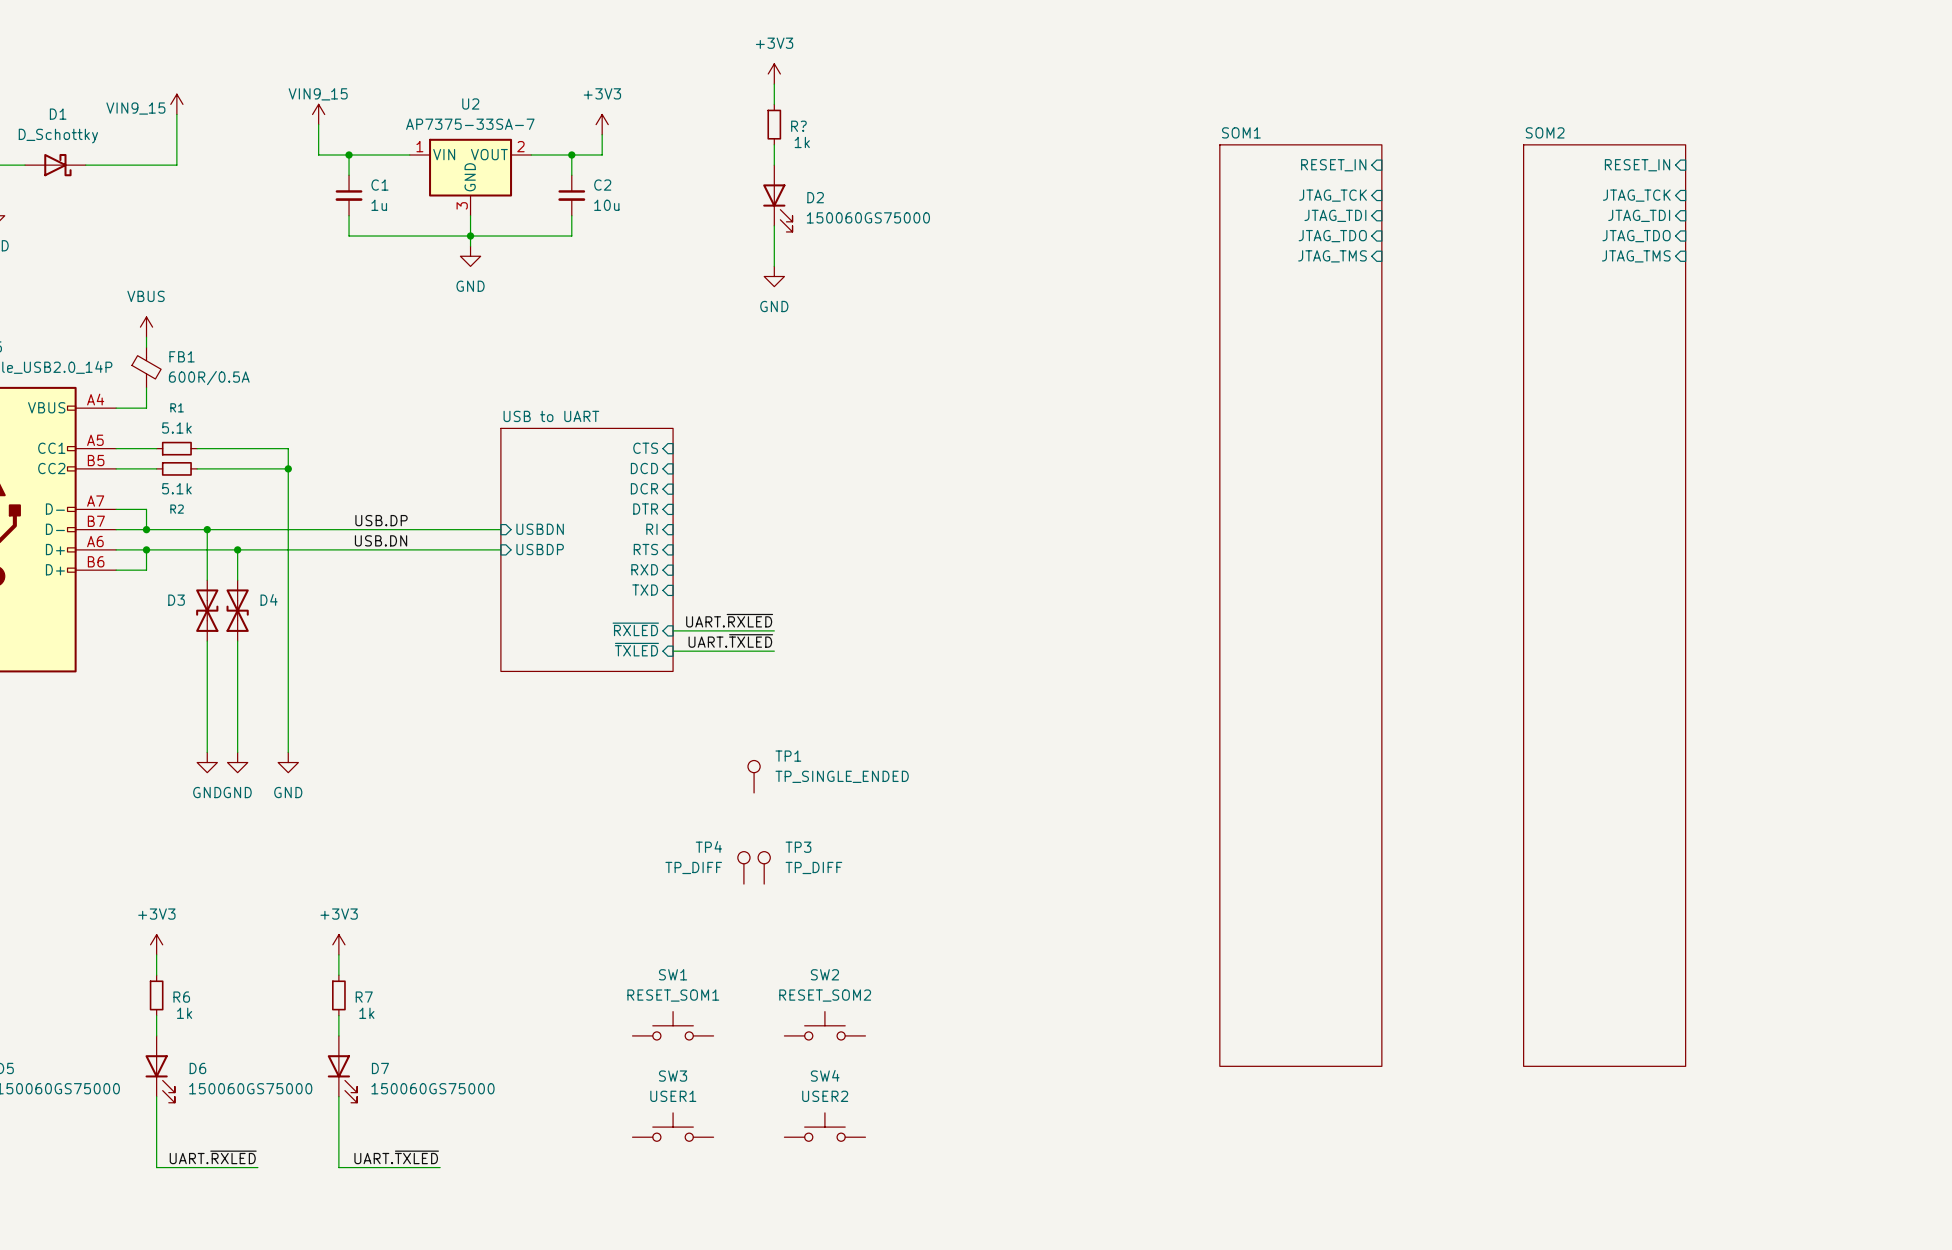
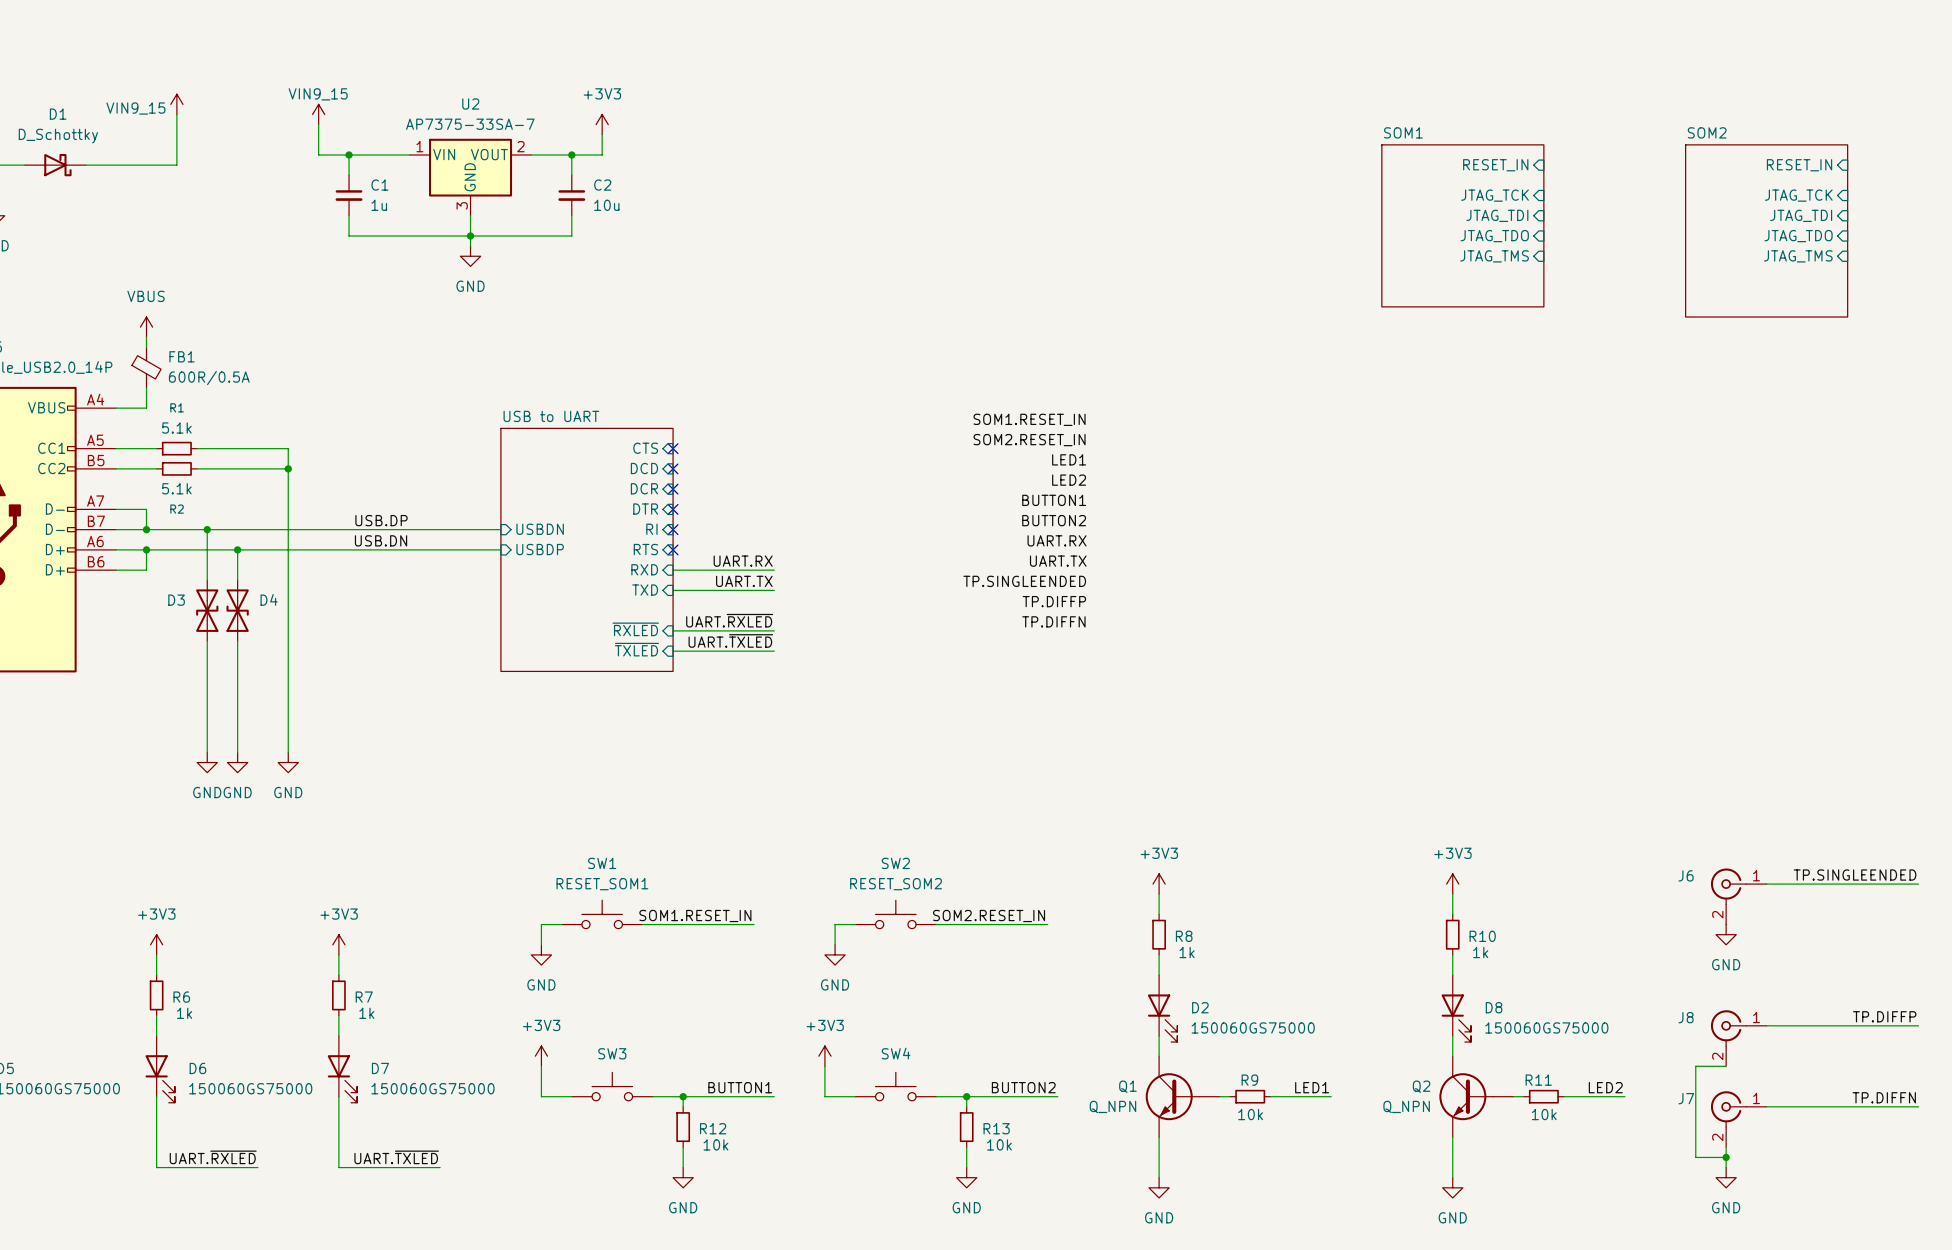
power symbol: +3V3 (774, 73) -> none
wire: (774, 84) (774, 104) -> none
R?: 1k (774, 124) -> none
sheet SOM1 name position: SOM1 (1241, 132) -> SOM1 (1403, 132)
sheet SOM2 name position: SOM2 (1545, 132) -> SOM2 (1707, 132)
wire: (774, 144) (774, 165) -> none
sheet SOM1 shape: [1219, 144, 1383, 1067] -> [1381, 144, 1545, 308]
sheet SOM2 shape: [1523, 144, 1687, 1067] -> [1685, 144, 1849, 318]
sheet pin: RESET_IN (1333, 165) -> none
sheet pin: none -> RESET_IN (1495, 165)
sheet pin: RESET_IN (1637, 165) -> none
sheet pin: none -> RESET_IN (1799, 165)
sheet pin: JTAG_TCK (1333, 195) -> none
sheet pin: none -> JTAG_TCK (1495, 195)
sheet pin: JTAG_TCK (1636, 195) -> none
sheet pin: none -> JTAG_TCK (1798, 195)
D2 position: (777, 198) -> (1162, 1008)
sheet pin: JTAG_TDI (1335, 215) -> none
sheet pin: none -> JTAG_TDI (1497, 215)
sheet pin: JTAG_TDI (1639, 215) -> none
sheet pin: none -> JTAG_TDI (1801, 215)
wire: (774, 225) (774, 266) -> none
sheet pin: JTAG_TDO (1332, 236) -> none
sheet pin: none -> JTAG_TDO (1494, 236)
sheet pin: JTAG_TDO (1636, 236) -> none
sheet pin: none -> JTAG_TDO (1798, 236)
sheet pin: JTAG_TMS (1332, 256) -> none
sheet pin: none -> JTAG_TMS (1494, 256)
sheet pin: JTAG_TMS (1636, 256) -> none
sheet pin: none -> JTAG_TMS (1798, 256)
power symbol: GND (774, 276) -> none
label: none -> SOM1.RESET_IN (1029, 419)
label: none -> SOM2.RESET_IN (1029, 440)
no-connect mark: none -> (673, 448)
label: none -> LED1 (1069, 459)
no-connect mark: none -> (673, 468)
label: none -> LED2 (1069, 480)
no-connect mark: none -> (673, 489)
label: none -> BUTTON1 (1054, 500)
no-connect mark: none -> (673, 509)
label: none -> BUTTON2 (1054, 520)
no-connect mark: none -> (673, 529)
label: none -> UART.RX (1057, 540)
no-connect mark: none -> (673, 549)
label: none -> UART.RX (743, 561)
label: none -> UART.TX (1058, 561)
wire: none -> (673, 570) (774, 570)
label: none -> UART.TX (744, 581)
label: none -> TP.SINGLEENDED (1024, 581)
wire: none -> (673, 590) (774, 590)
label: none -> TP.DIFFP (1054, 601)
label: none -> TP.DIFFN (1053, 621)
TP1: TP_SINGLE_ENDED (754, 776) -> none
TP4: TP_DIFF (743, 867) -> none
TP3: TP_DIFF (764, 867) -> none
label: none -> TP.SINGLEENDED (1855, 875)
power symbol: none -> +3V3 (1159, 884)
power symbol: none -> +3V3 (1452, 884)
wire: none -> (1766, 884) (1918, 884)
wire: none -> (1159, 894) (1159, 914)
wire: none -> (1452, 894) (1452, 914)
J6: none -> (1738, 896)
label: none -> SOM1.RESET_IN (695, 916)
label: none -> SOM2.RESET_IN (989, 916)
wire: none -> (561, 924) (541, 924) (541, 944)
wire: none -> (642, 924) (754, 924)
wire: none -> (855, 924) (835, 924) (835, 944)
wire: none -> (936, 924) (1047, 924)
R8: none -> 1k (1159, 934)
R10: none -> 1k (1452, 934)
power symbol: none -> GND (1726, 934)
power symbol: none -> GND (541, 954)
power symbol: none -> GND (835, 954)
wire: none -> (1159, 954) (1159, 975)
wire: none -> (1452, 954) (1452, 975)
D8: none -> 150060GS75000 (1456, 1008)
label: none -> TP.DIFFP (1884, 1016)
SW1 position: (673, 1025) -> (602, 914)
SW2 position: (824, 1025) -> (895, 914)
wire: none -> (1766, 1025) (1918, 1025)
wire: none -> (1159, 1035) (1159, 1056)
wire: none -> (1452, 1035) (1452, 1056)
J8: none -> (1738, 1038)
power symbol: none -> +3V3 (541, 1056)
power symbol: none -> +3V3 (824, 1056)
wire: none -> (541, 1066) (541, 1096) (571, 1096)
wire: none -> (824, 1066) (824, 1096) (855, 1096)
wire: none -> (1726, 1066) (1695, 1066) (1695, 1157) (1726, 1157)
SW4 name position: SW4 (825, 1075) -> SW4 (896, 1053)
SW3 name position: SW3 (673, 1076) -> SW3 (612, 1053)
label: none -> BUTTON1 (740, 1087)
label: none -> BUTTON2 (1023, 1087)
label: none -> LED1 (1312, 1087)
label: none -> LED2 (1605, 1087)
wire: none -> (652, 1096) (774, 1096)
SW3 value: USER1 (673, 1096) -> none
wire: none -> (683, 1096) (683, 1106)
junction: none -> (683, 1096)
SW4 value: USER2 (825, 1096) -> none
wire: none -> (936, 1096) (1057, 1096)
wire: none -> (966, 1096) (966, 1106)
junction: none -> (966, 1096)
Q1: none -> Q_NPN (1182, 1096)
wire: none -> (1219, 1096) (1229, 1096)
R9: none -> 10k (1250, 1096)
wire: none -> (1270, 1096) (1331, 1096)
Q2: none -> Q_NPN (1476, 1096)
wire: none -> (1513, 1096) (1523, 1096)
R11: none -> 10k (1543, 1096)
wire: none -> (1564, 1096) (1624, 1096)
label: none -> TP.DIFFN (1884, 1097)
wire: none -> (1766, 1106) (1918, 1106)
J7: none -> (1738, 1119)
SW3 position: (673, 1127) -> (612, 1086)
R12: none -> 10k (683, 1127)
SW4 position: (824, 1127) -> (895, 1086)
R13: none -> 10k (966, 1127)
wire: none -> (1159, 1137) (1159, 1177)
wire: none -> (1452, 1137) (1452, 1177)
wire: none -> (683, 1147) (683, 1167)
wire: none -> (966, 1147) (966, 1167)
wire: none -> (1726, 1147) (1726, 1167)
junction: none -> (1726, 1157)
power symbol: none -> GND (683, 1177)
power symbol: none -> GND (966, 1177)
power symbol: none -> GND (1726, 1177)
power symbol: none -> GND (1159, 1187)
power symbol: none -> GND (1452, 1187)

